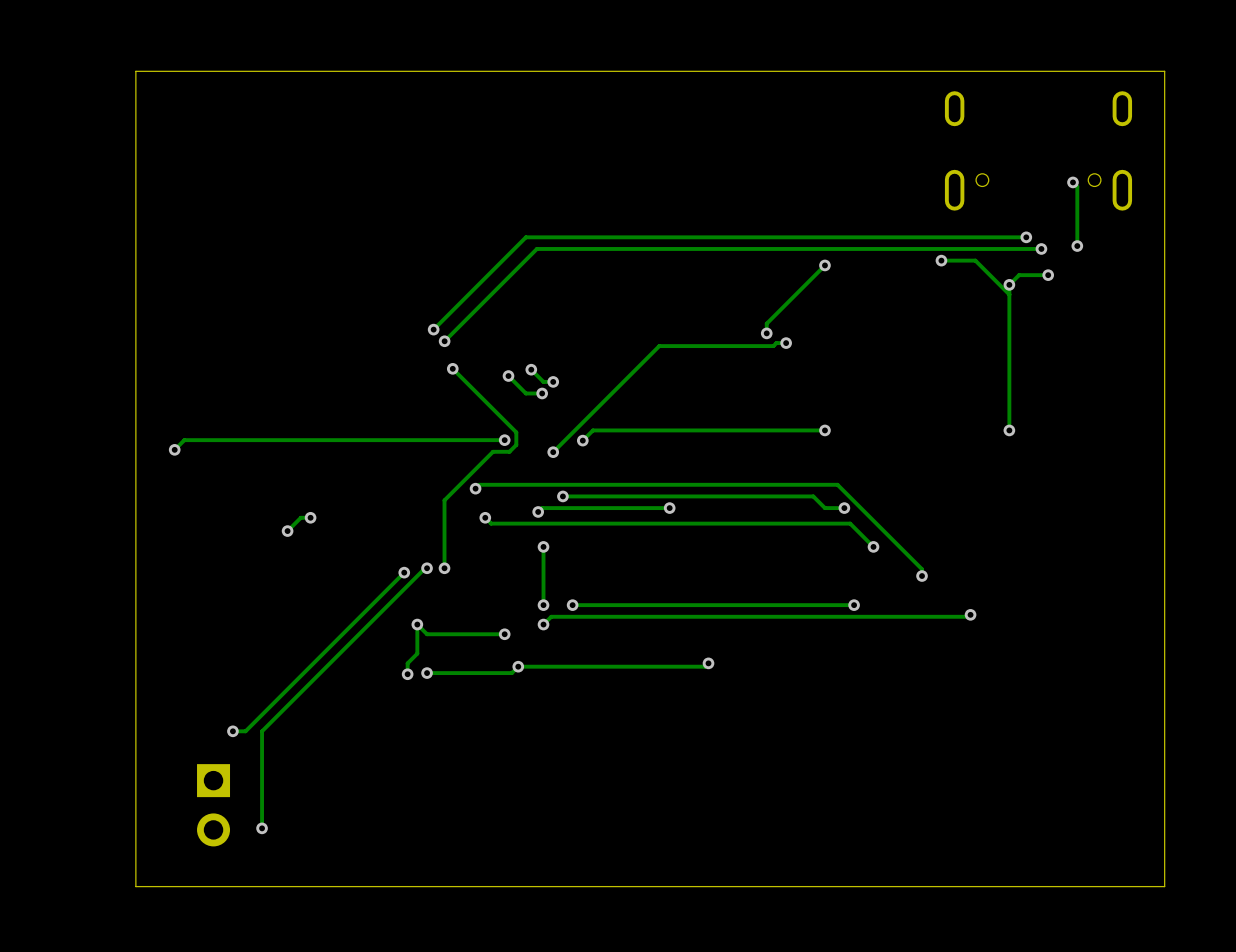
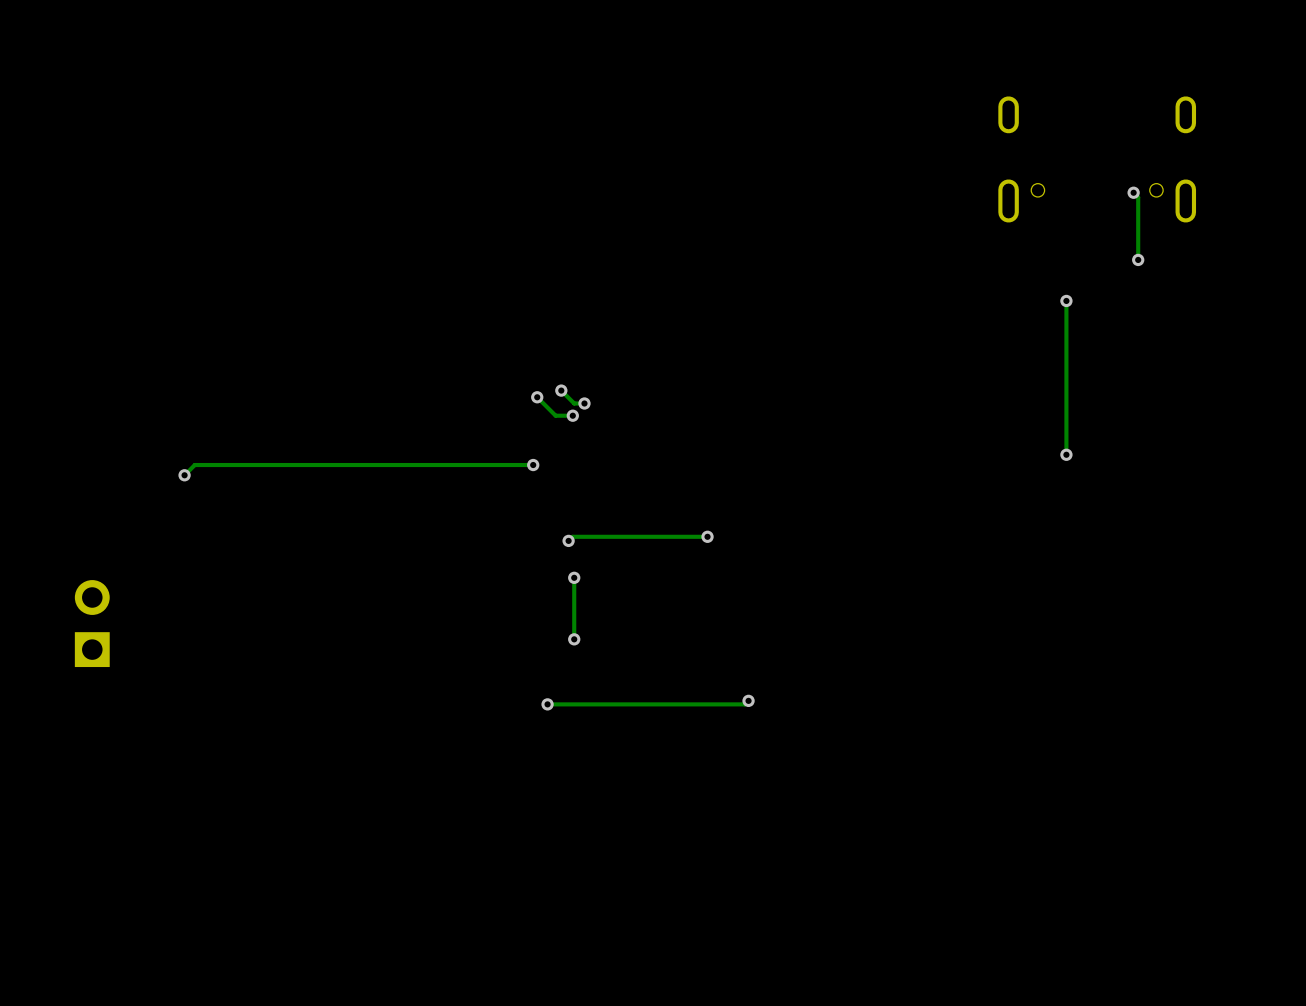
board edge: (1164, 71) (135, 71) (135, 886) (1164, 886) (1164, 71) -> none
track: (1026, 237) (525, 237) (433, 329) -> none
via: (1026, 237) -> none
track: (1041, 248) (536, 248) (444, 341) -> none
via: (1041, 248) -> none
track: (941, 260) (975, 260) (1009, 294) -> none
via: (941, 260) -> none
track: (824, 265) (766, 323) (766, 333) -> none
via: (824, 265) -> none
track: (1048, 275) (1019, 275) (1009, 284) -> none
via: (1048, 275) -> none
via: (433, 329) -> none
via: (766, 333) -> none
via: (444, 341) -> none
track: (786, 343) (776, 343) (773, 346) (659, 346) (553, 452) -> none
via: (786, 343) -> none
track: (452, 368) (516, 432) (516, 444) (509, 451) (493, 451) (444, 500) (444, 568) -> none
via: (452, 368) -> none
track: (824, 430) (592, 430) (582, 440) -> none
via: (824, 430) -> none
via: (582, 440) -> none
via: (553, 452) -> none
track: (475, 488) (479, 484) (837, 484) (922, 569) (922, 576) -> none
via: (475, 488) -> none
track: (562, 496) (813, 496) (824, 508) (844, 508) -> none
via: (562, 496) -> none
via: (844, 508) -> none
track: (310, 517) (300, 517) (287, 531) -> none
via: (310, 517) -> none
track: (485, 517) (491, 523) (850, 523) (873, 546) -> none
via: (485, 517) -> none
via: (287, 531) -> none
via: (873, 546) -> none
track: (427, 568) (262, 731) (262, 828) -> none
via: (427, 568) -> none
via: (444, 568) -> none
track: (404, 572) (245, 731) (232, 731) -> none
via: (404, 572) -> none
via: (922, 576) -> none
via: (572, 605) -> none
track: (854, 605) (572, 605) -> none
via: (854, 605) -> none
track: (970, 614) (968, 616) (551, 616) (543, 624) -> none
via: (970, 614) -> none
via: (417, 624) -> none
via: (543, 624) -> none
track: (504, 634) (427, 634) (417, 624) (417, 653) (407, 663) (407, 674) -> none
via: (504, 634) -> none
track: (518, 666) (511, 673) (427, 673) -> none
via: (427, 673) -> none
via: (407, 674) -> none
via: (232, 731) -> none
part rotation: 0° (213, 805) -> 180° (92, 623)
part position: (213, 805) -> (92, 623)
via: (262, 828) -> none

